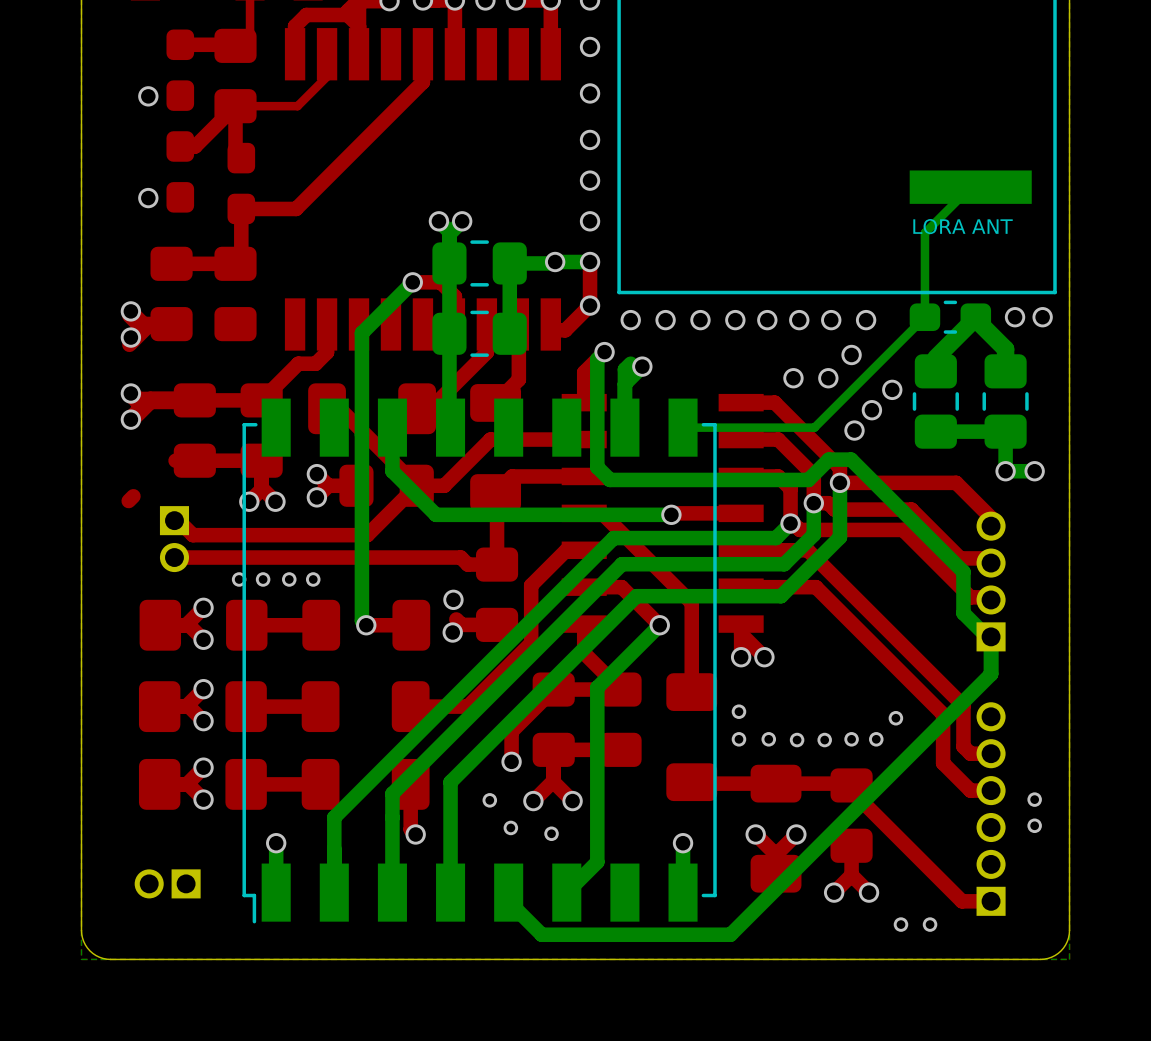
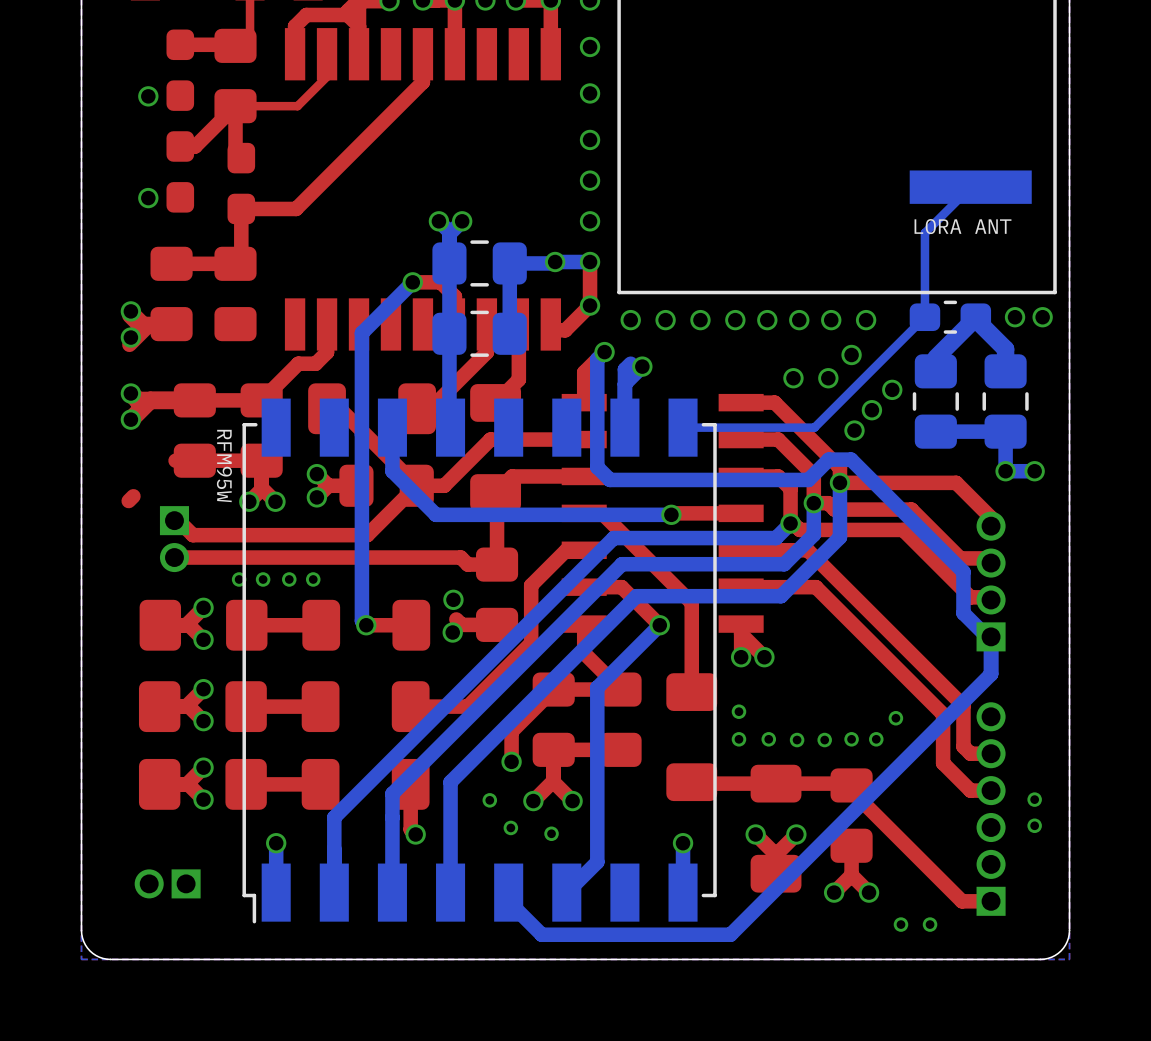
text: none -> RFM95W (224, 465)

